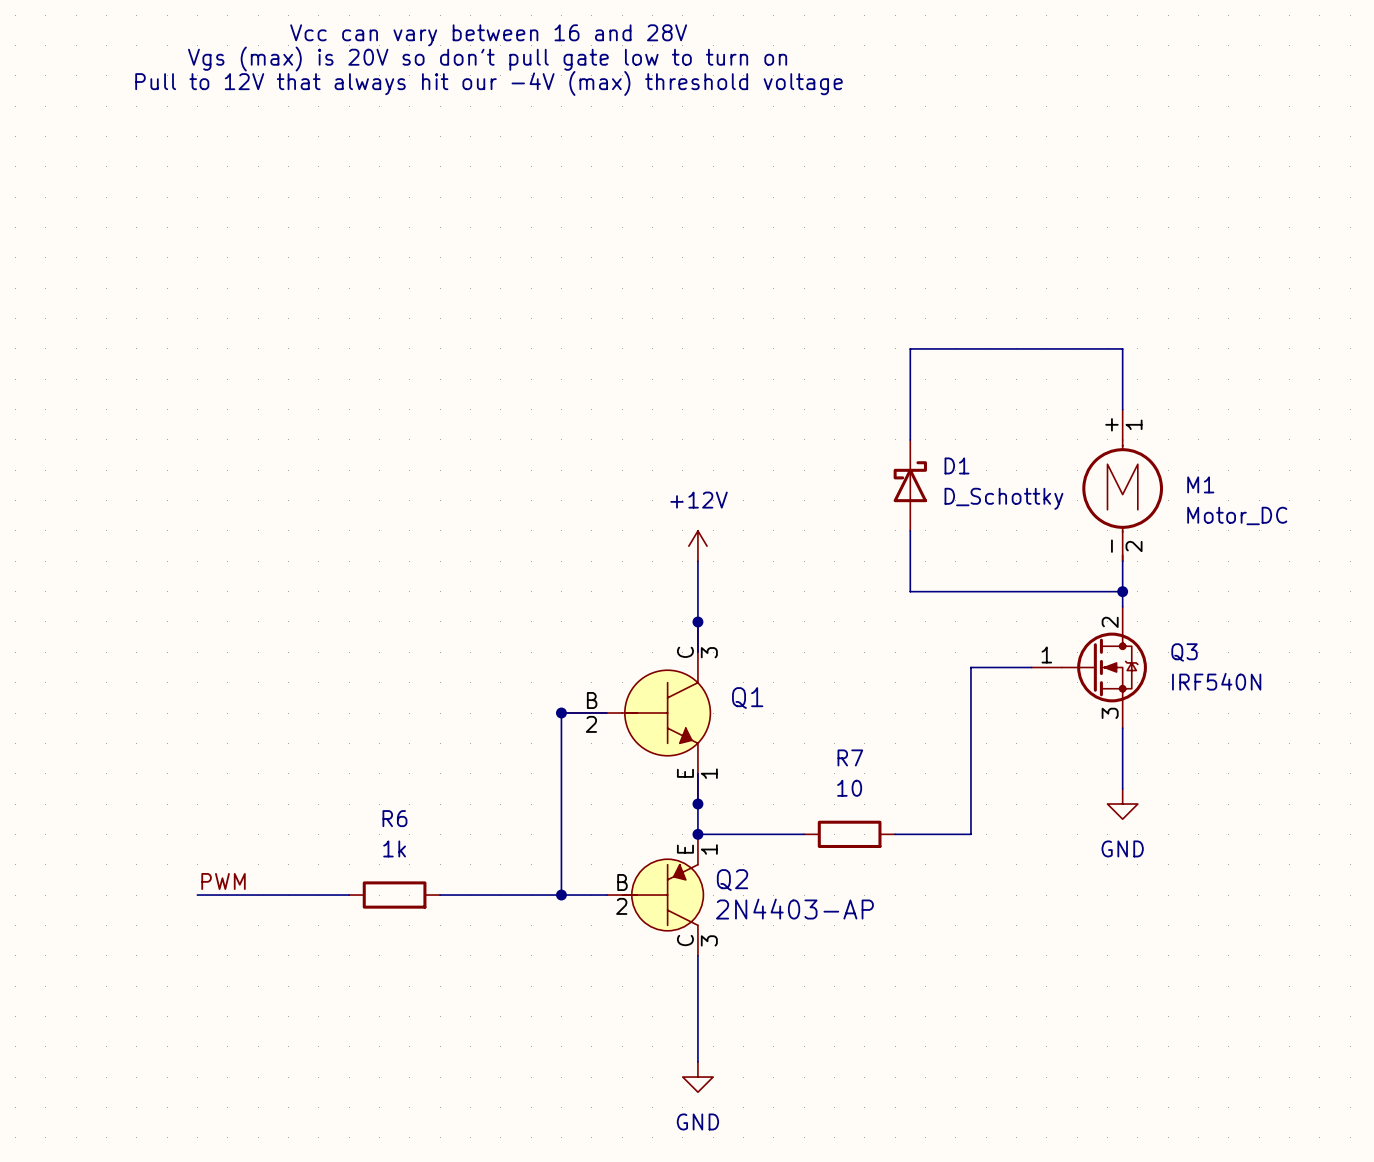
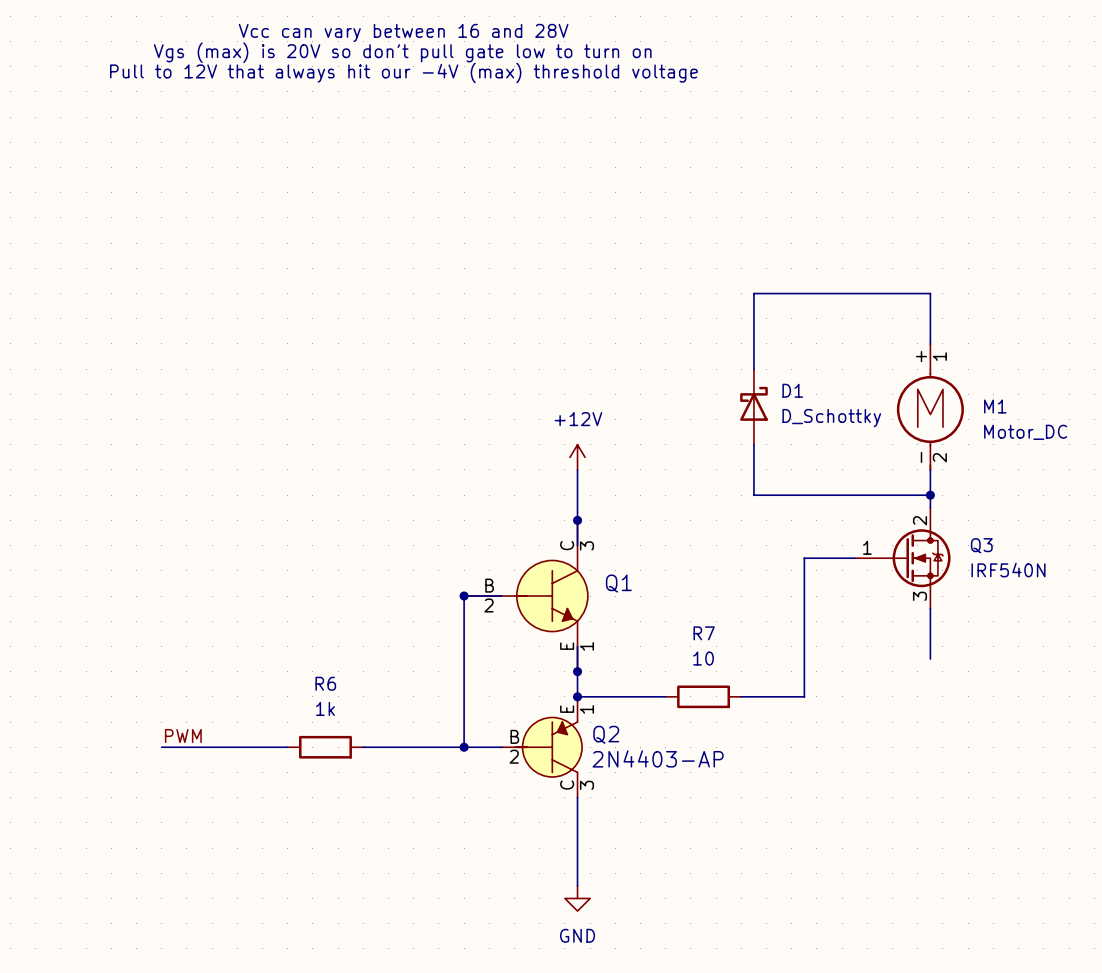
power symbol: GND (1122, 804) -> none

